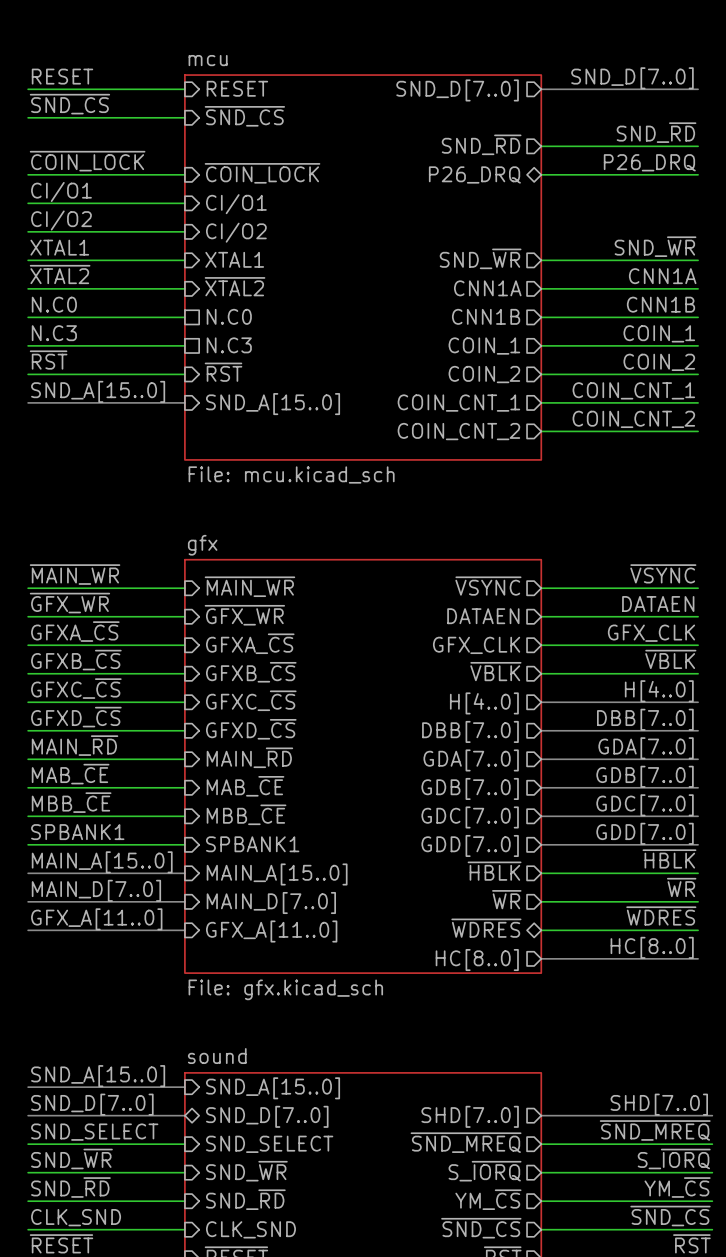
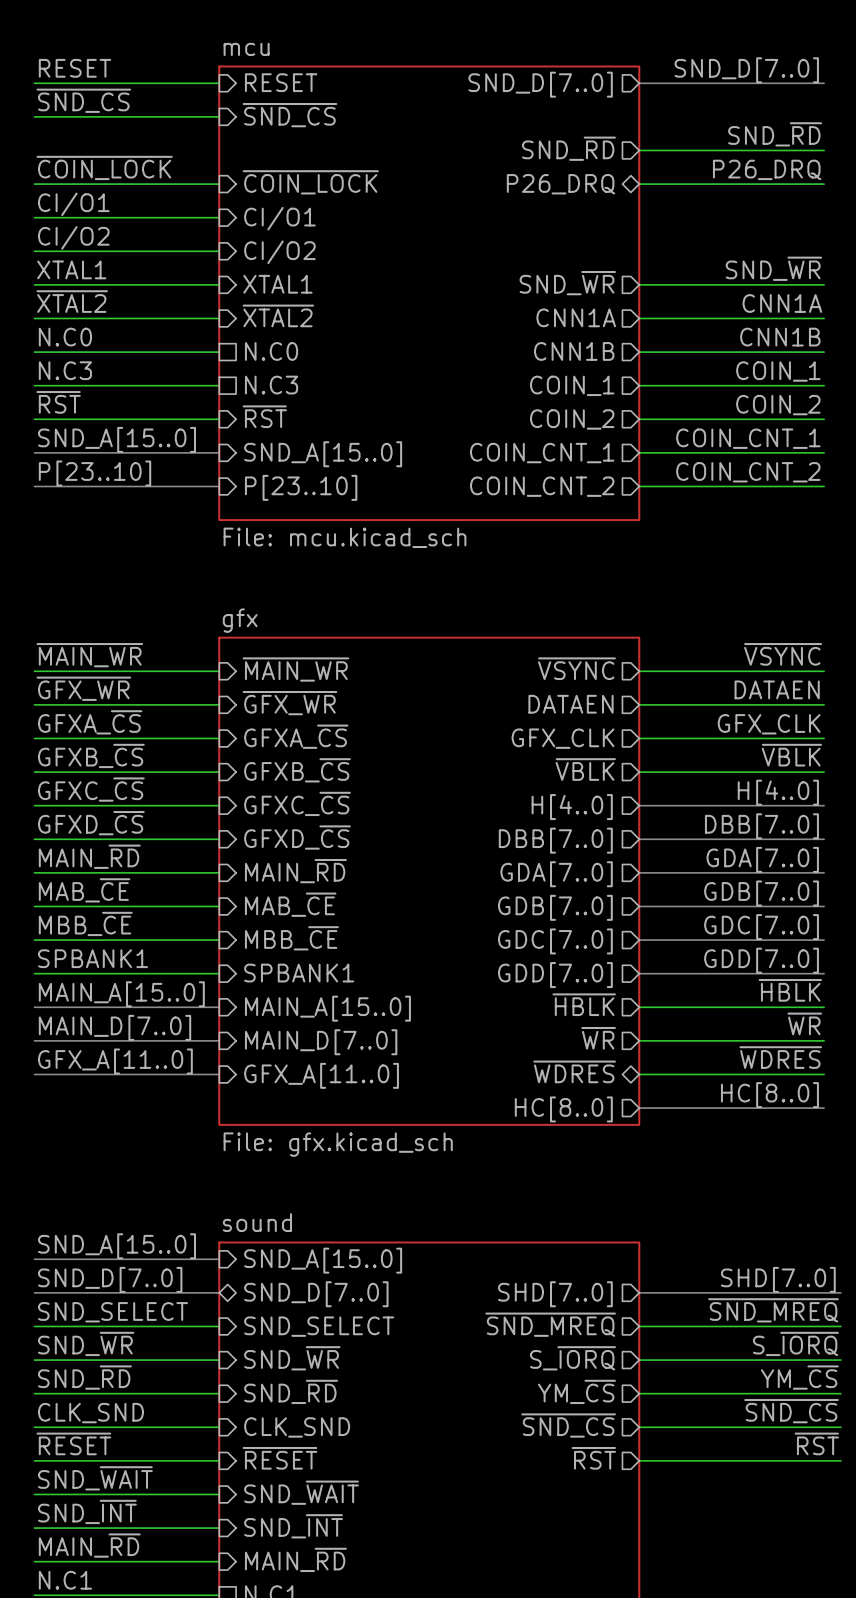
label: none -> P[23..10] (95, 473)
bus: none -> (34, 486) (219, 486)
sheet pin: none -> P[23..10] (301, 487)

